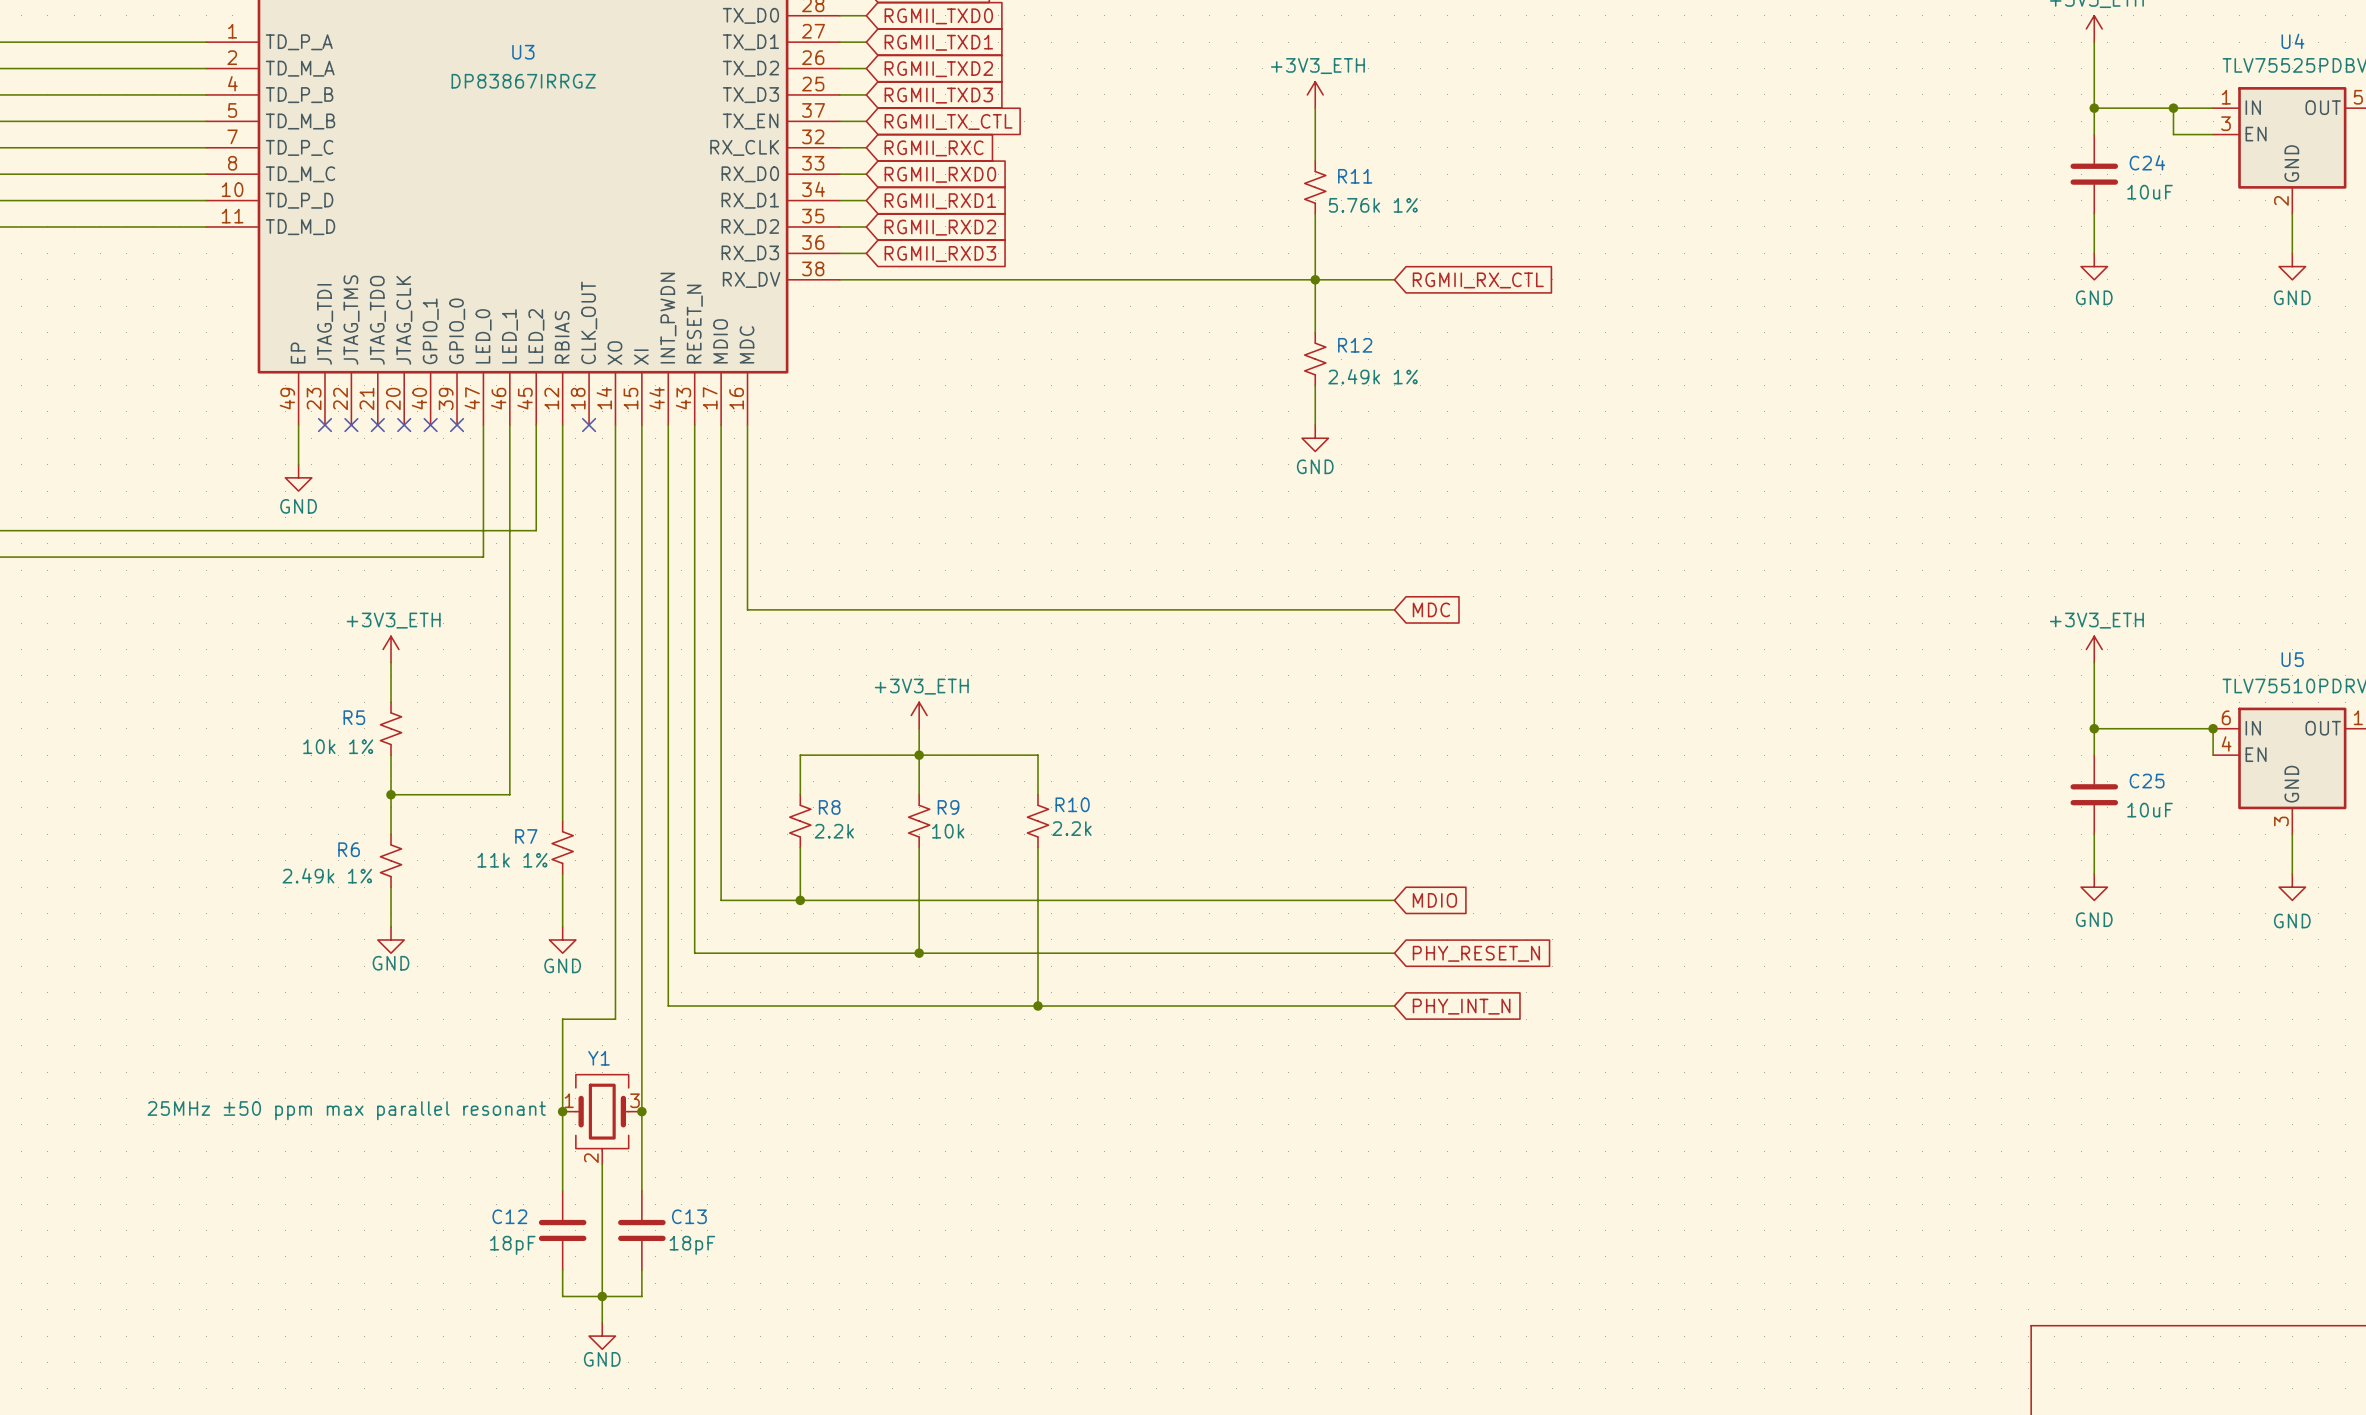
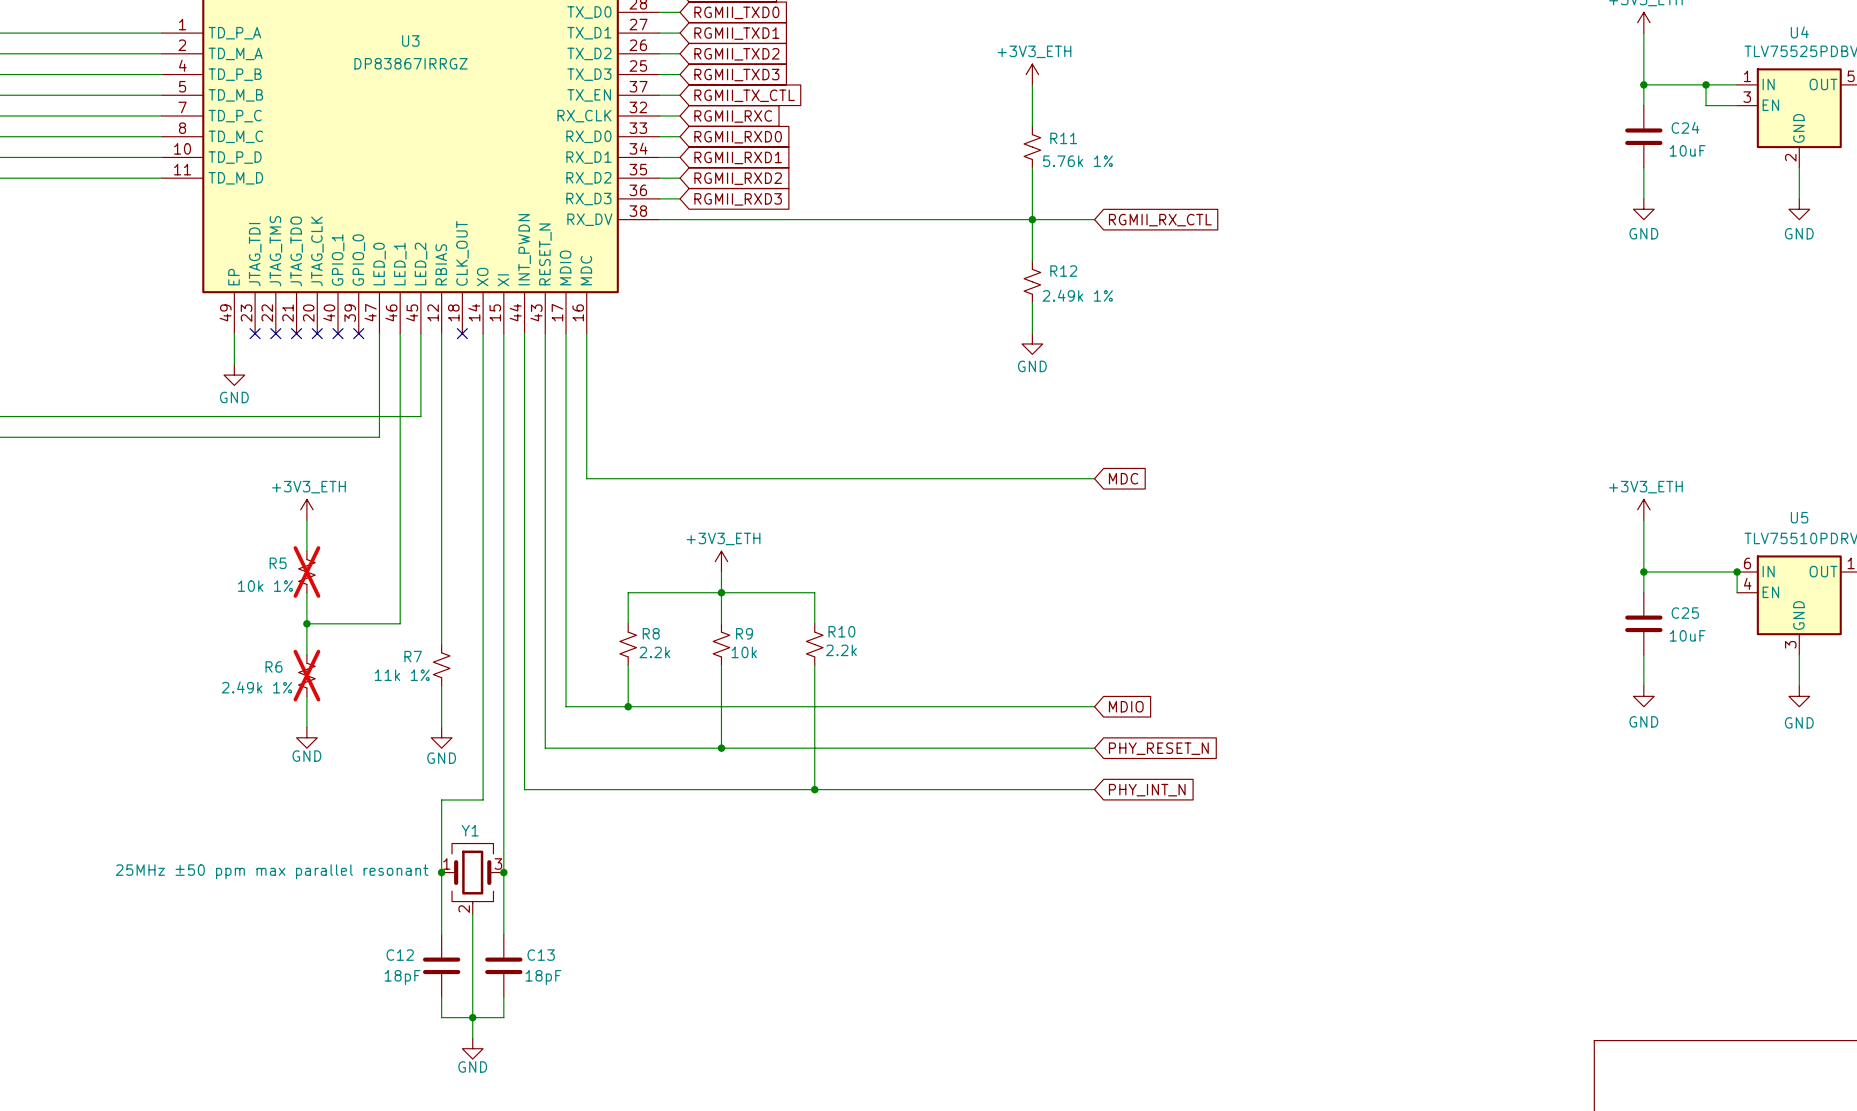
R5 do-not-place cross: none -> (306, 572)
R6 do-not-place cross: none -> (306, 675)

